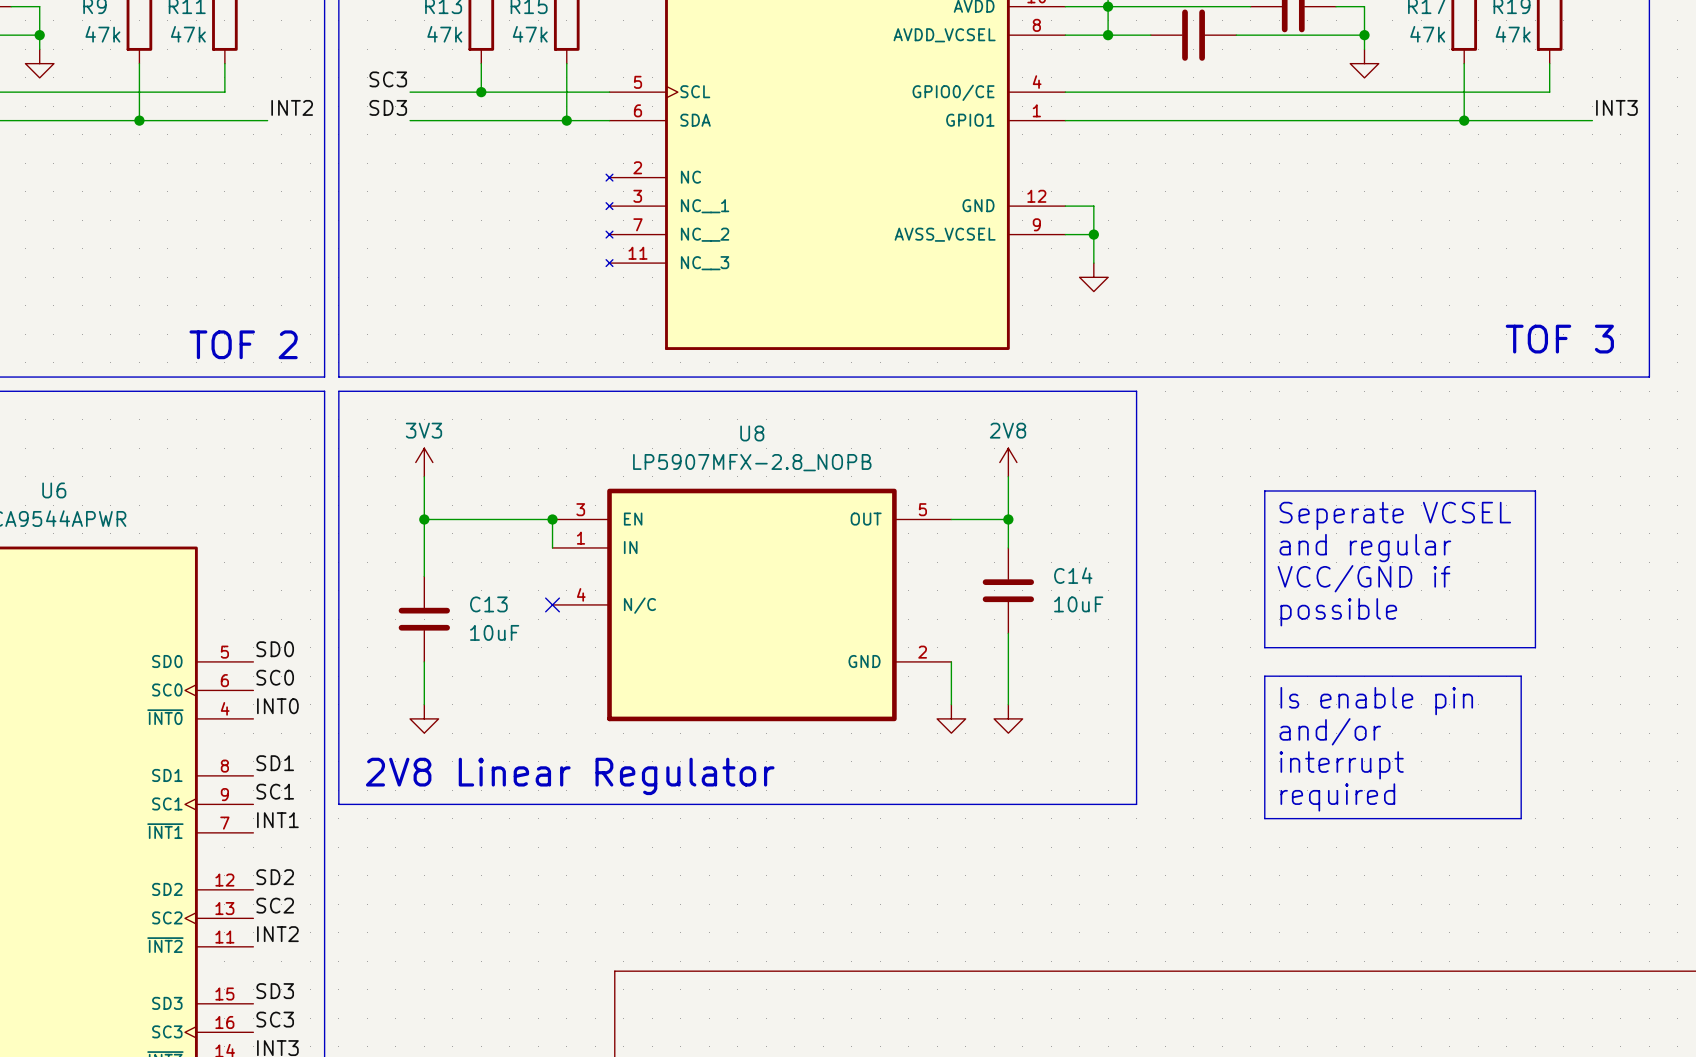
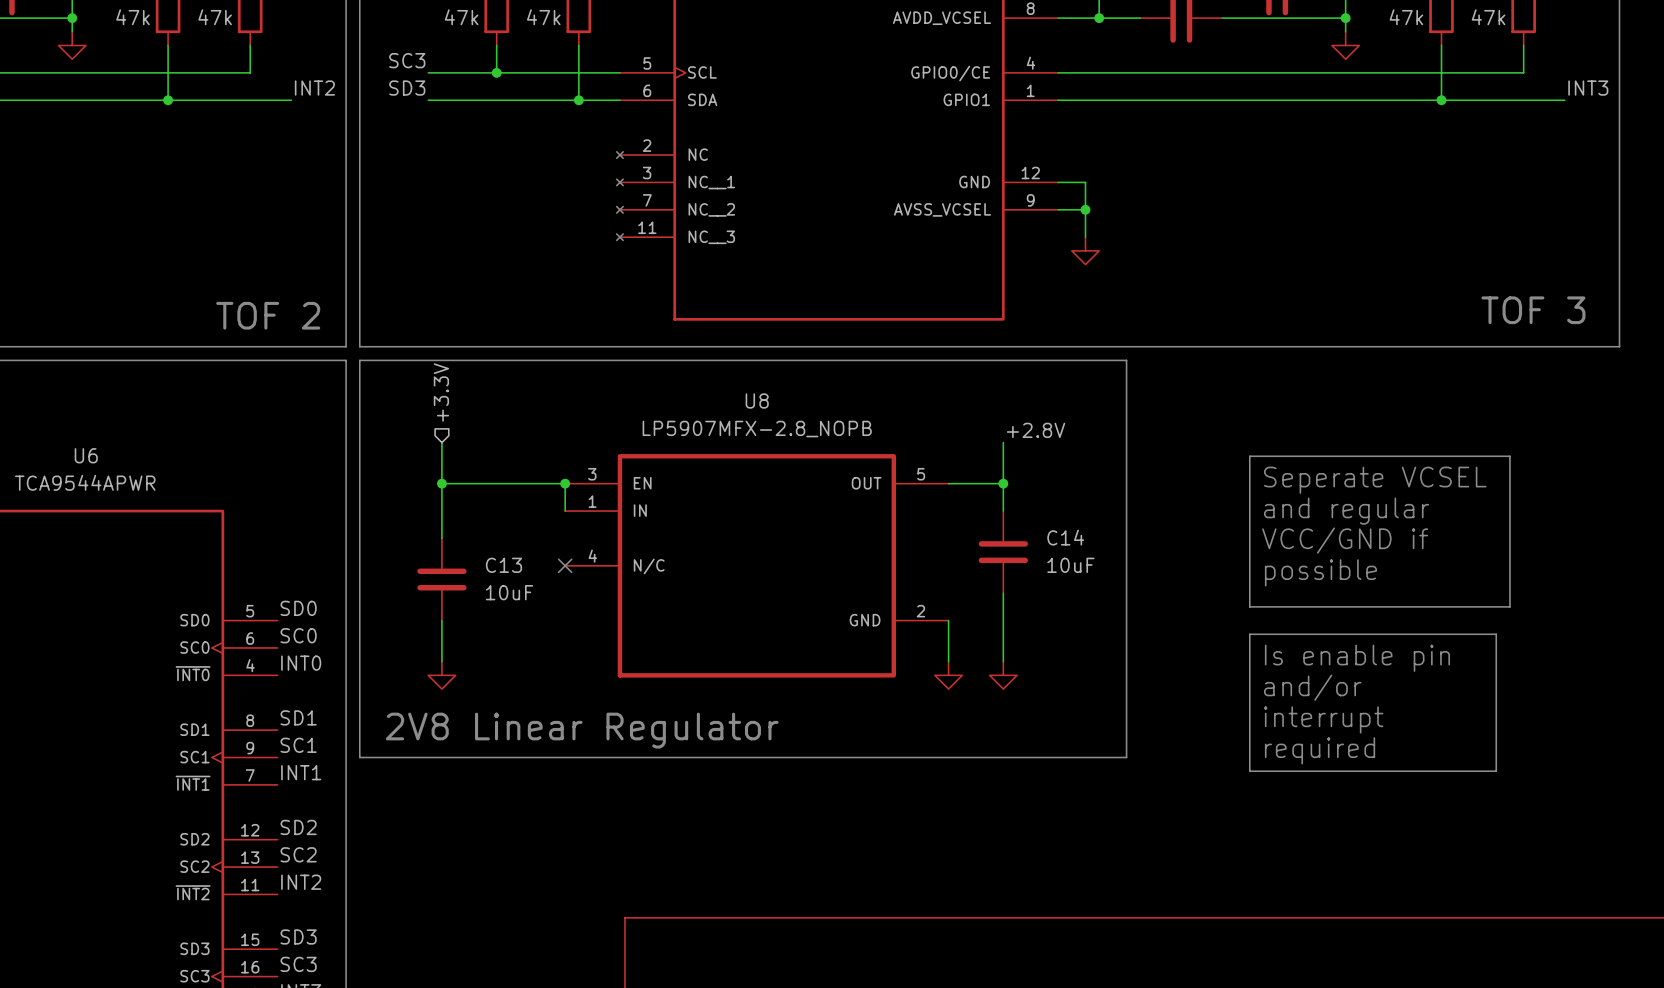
hierarchical label: none -> +3.3V (441, 392)
power symbol: 3V3 (424, 462) -> none
power symbol: 2V8 (1008, 462) -> none
label: none -> +2.8V (1036, 430)

